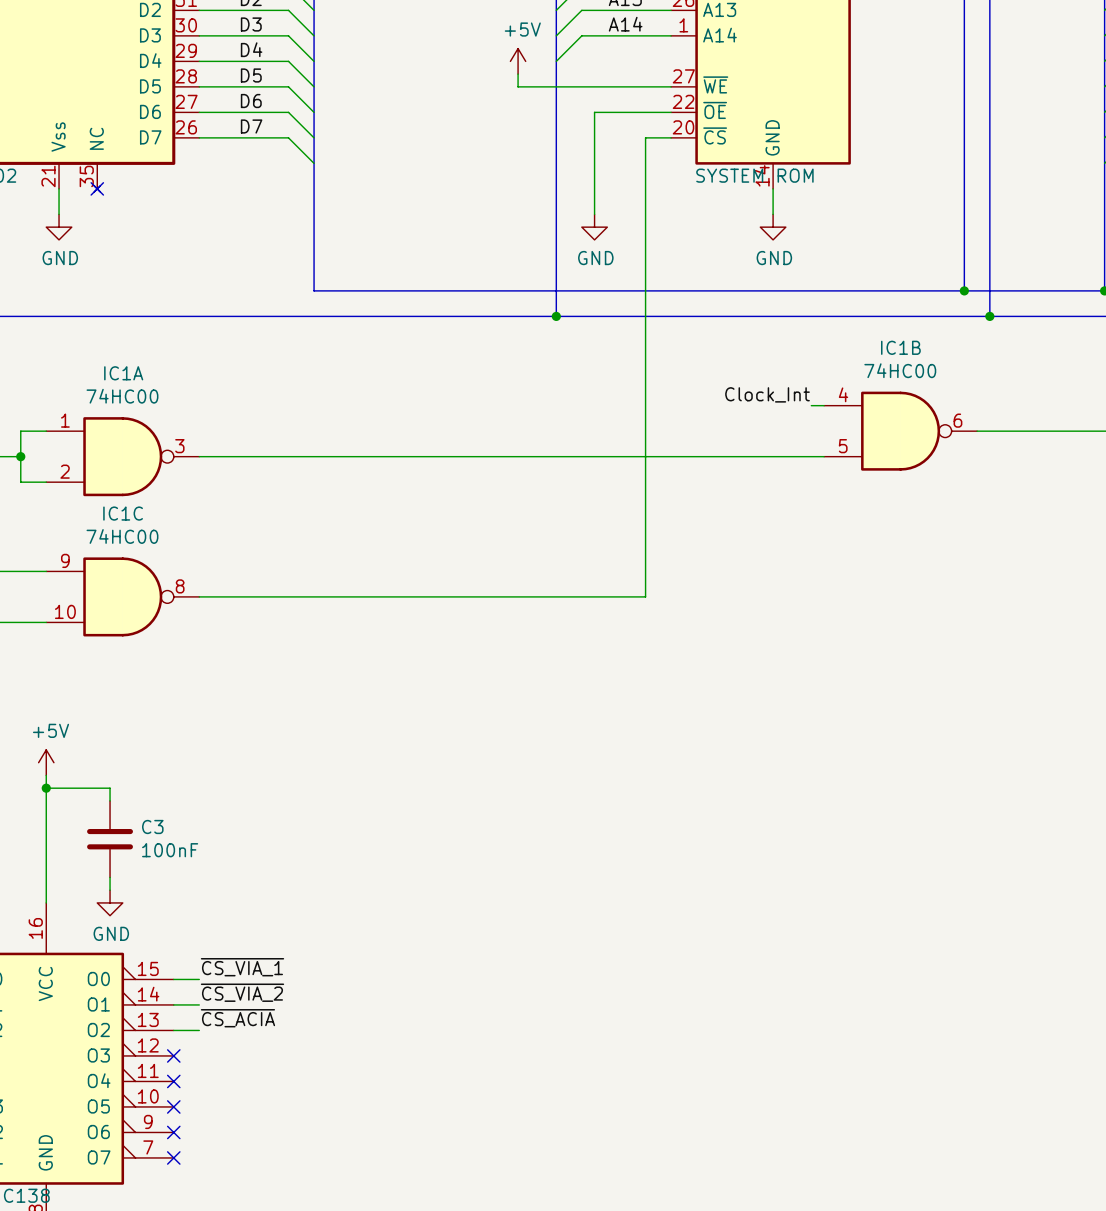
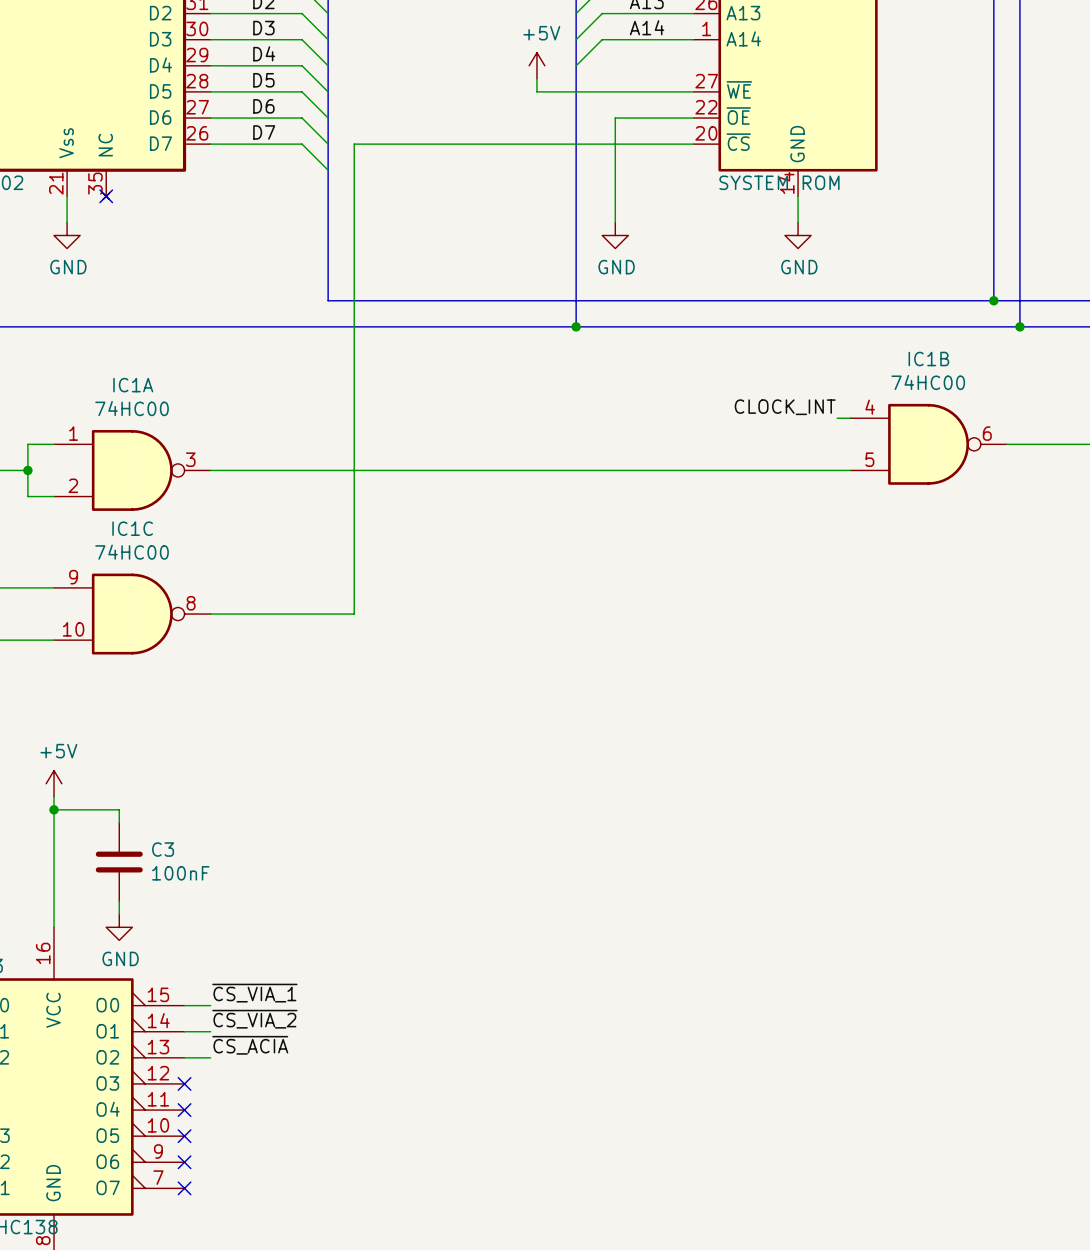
wire: (645, 137) (645, 596) (339, 596) -> (667, 144) (354, 144) (354, 614)
label: Clock_Int (767, 394) -> CLOCK_INT (785, 407)

